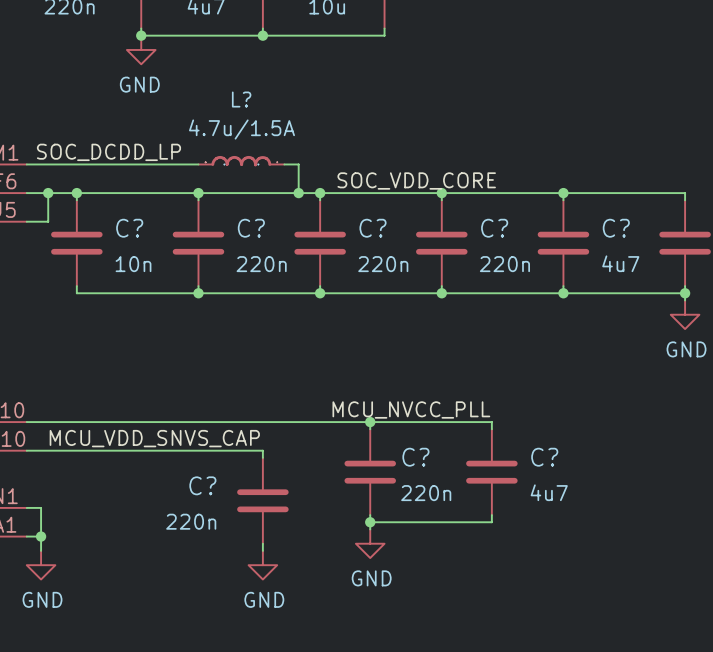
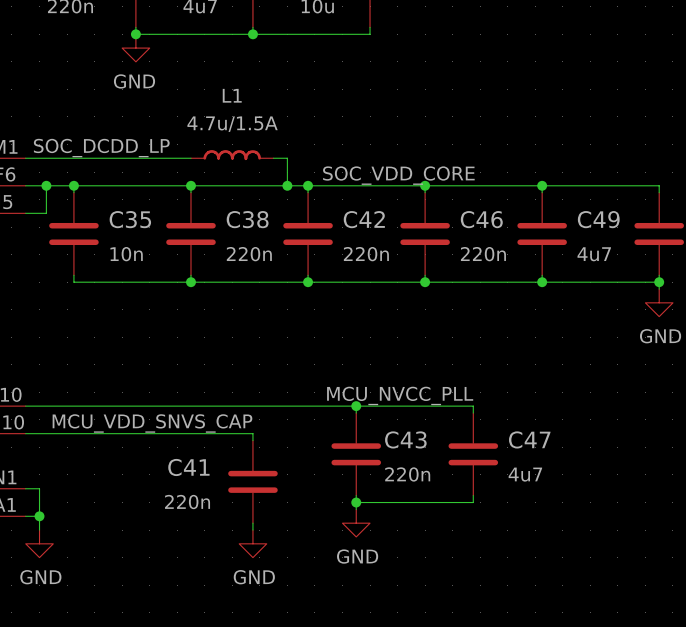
L? name: L? (241, 99) -> L1 (232, 95)
C? name: C? (129, 228) -> C35 (130, 219)
C? name: C? (251, 228) -> C38 (247, 219)
C? name: C? (373, 228) -> C42 (364, 219)
C? name: C? (494, 228) -> C46 (481, 219)
C? name: C? (616, 228) -> C49 (598, 219)
C? name: C? (415, 457) -> C43 (405, 439)
C? name: C? (544, 457) -> C47 (529, 439)
C? name: C? (202, 485) -> C41 (188, 467)

